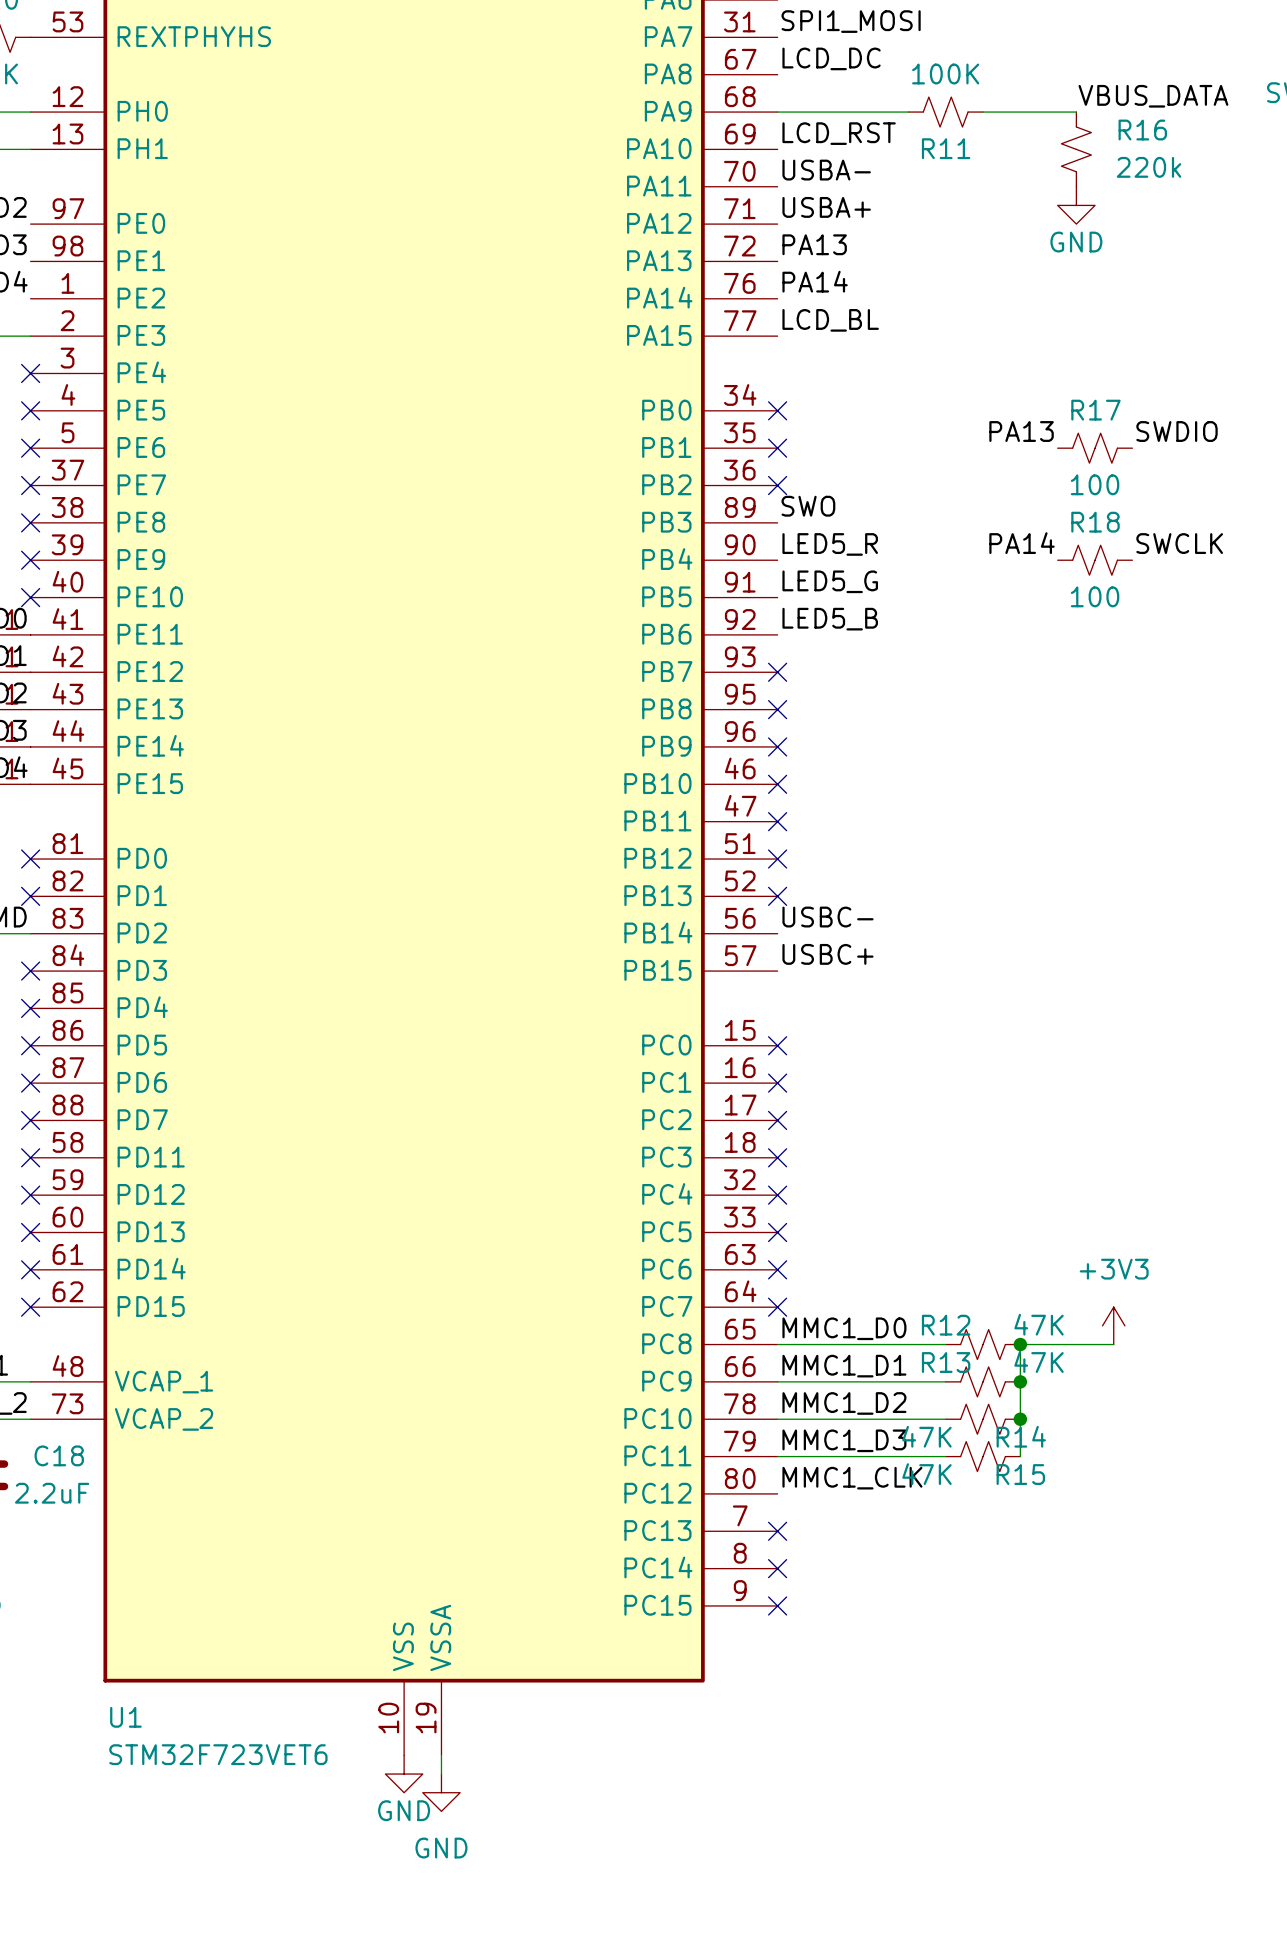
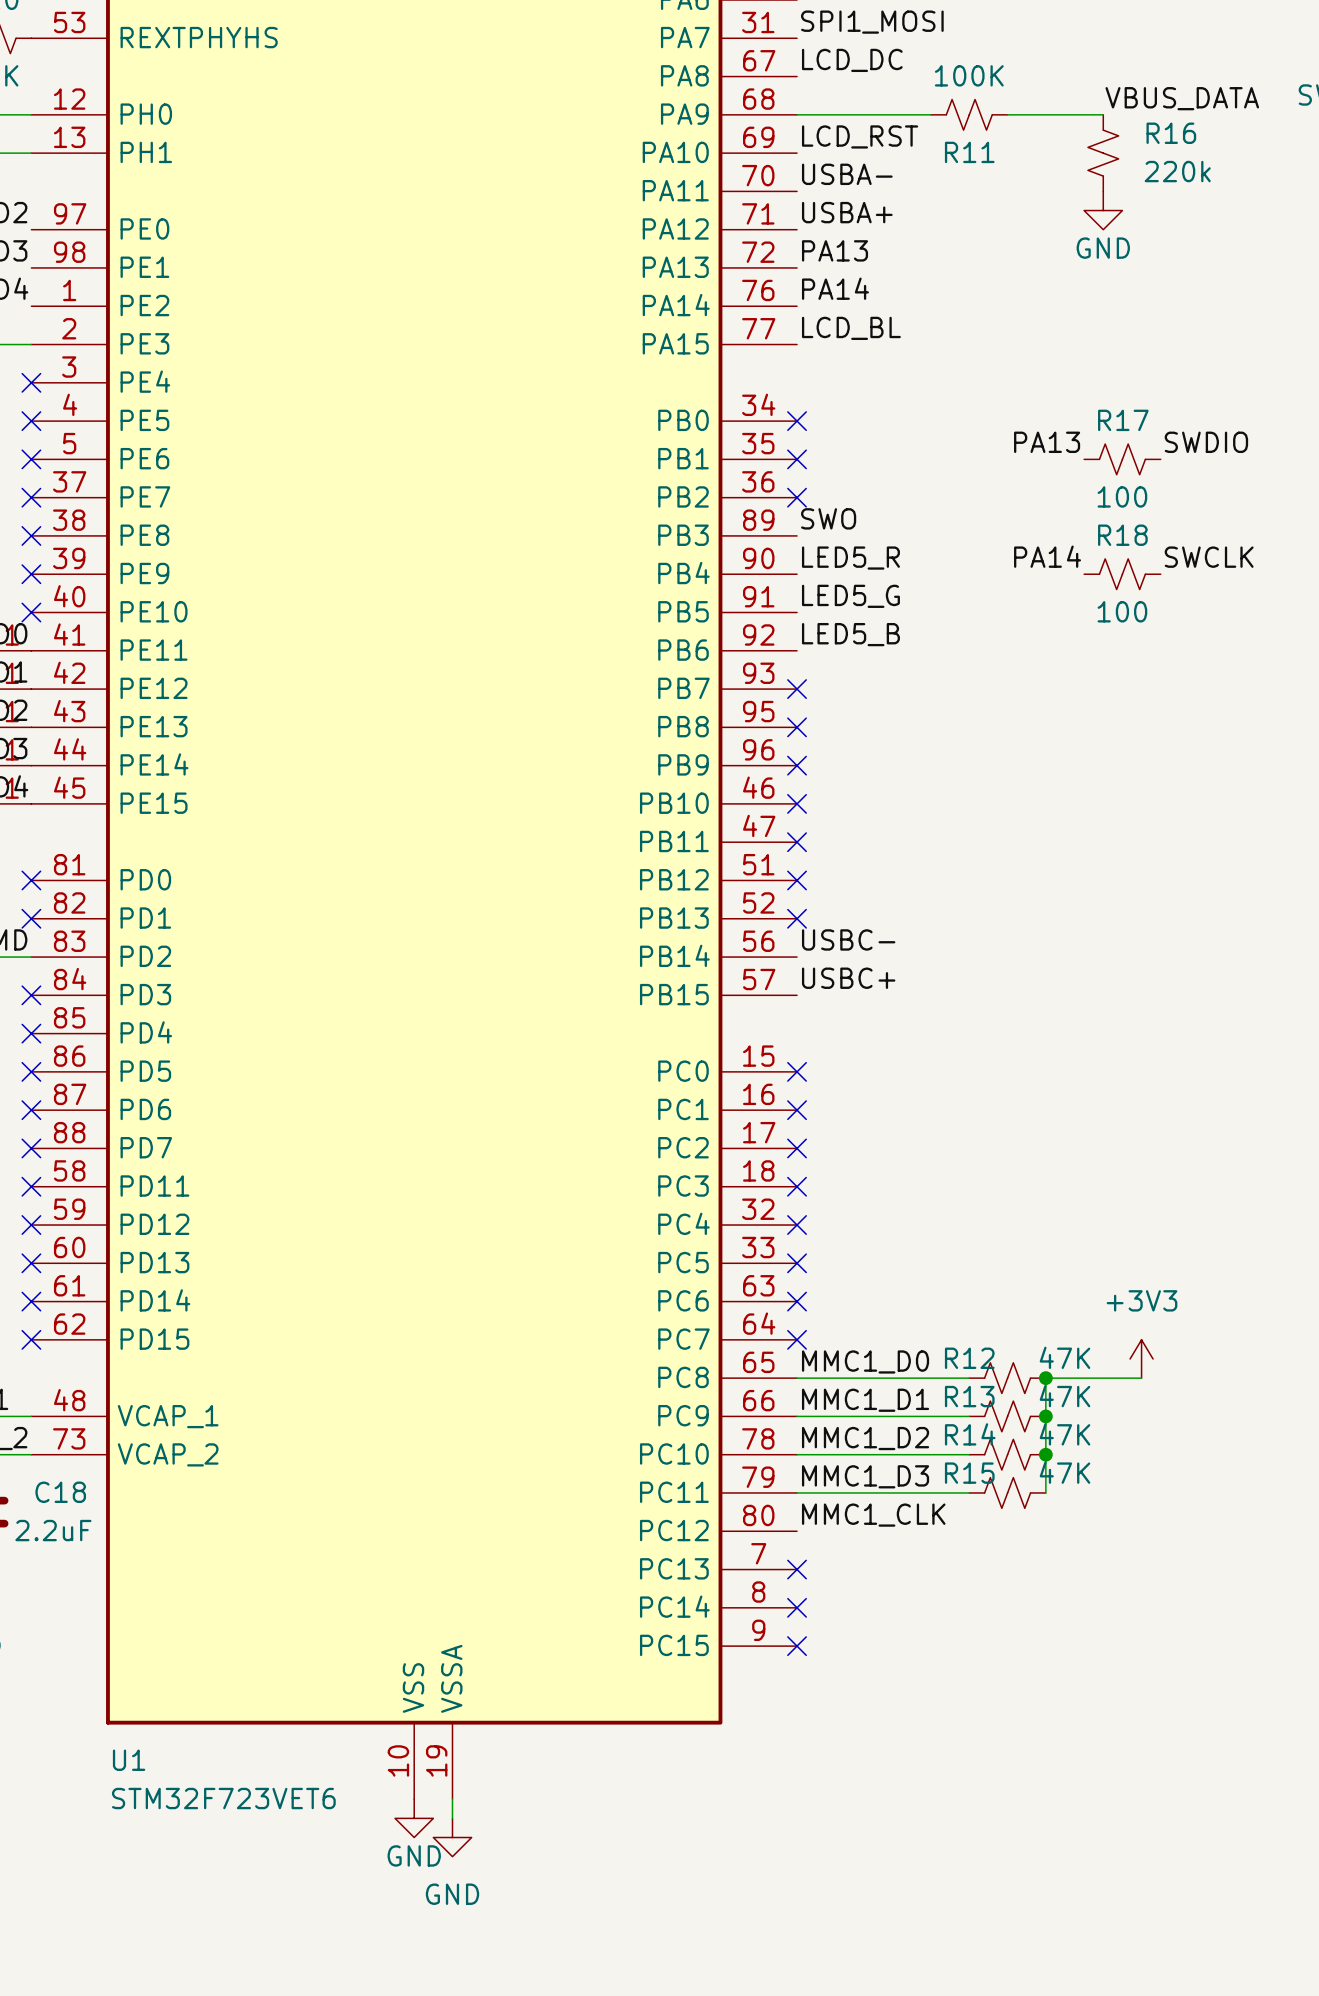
R14 value position: 47K (926, 1436) -> 47K (1065, 1434)
R14 name position: R14 (1021, 1436) -> R14 (970, 1434)
R15 value position: 47K (926, 1474) -> 47K (1065, 1472)
R15 name position: R15 (1020, 1474) -> R15 (969, 1473)

